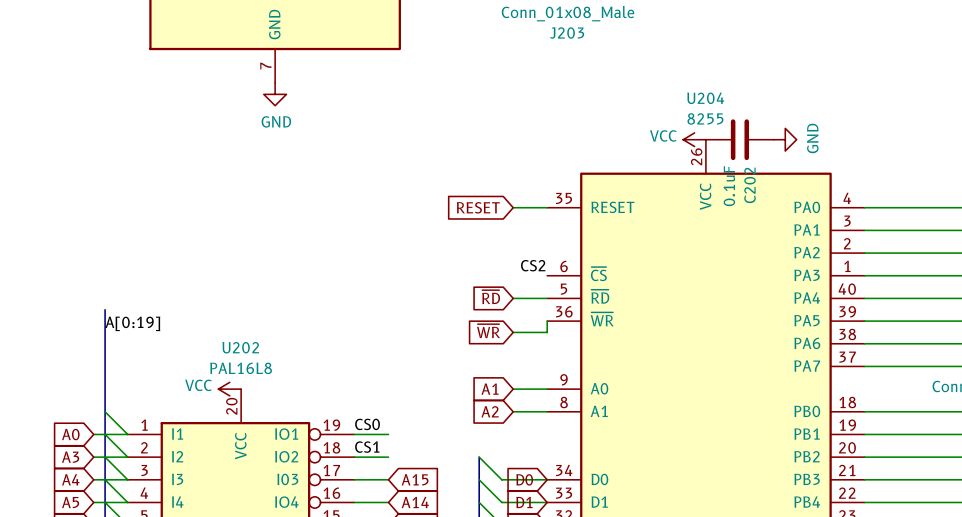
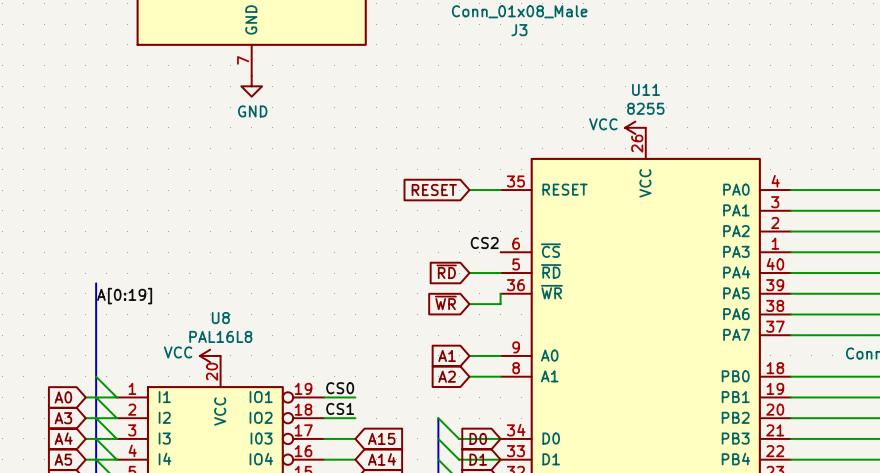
J203 name: J203 (567, 33) -> J3 (519, 30)
U204 name: U204 (705, 98) -> U11 (646, 89)
C202: 0.1uF (739, 139) -> none
power symbol: GND (785, 139) -> none
U202 name: U202 (240, 347) -> U8 (220, 318)

